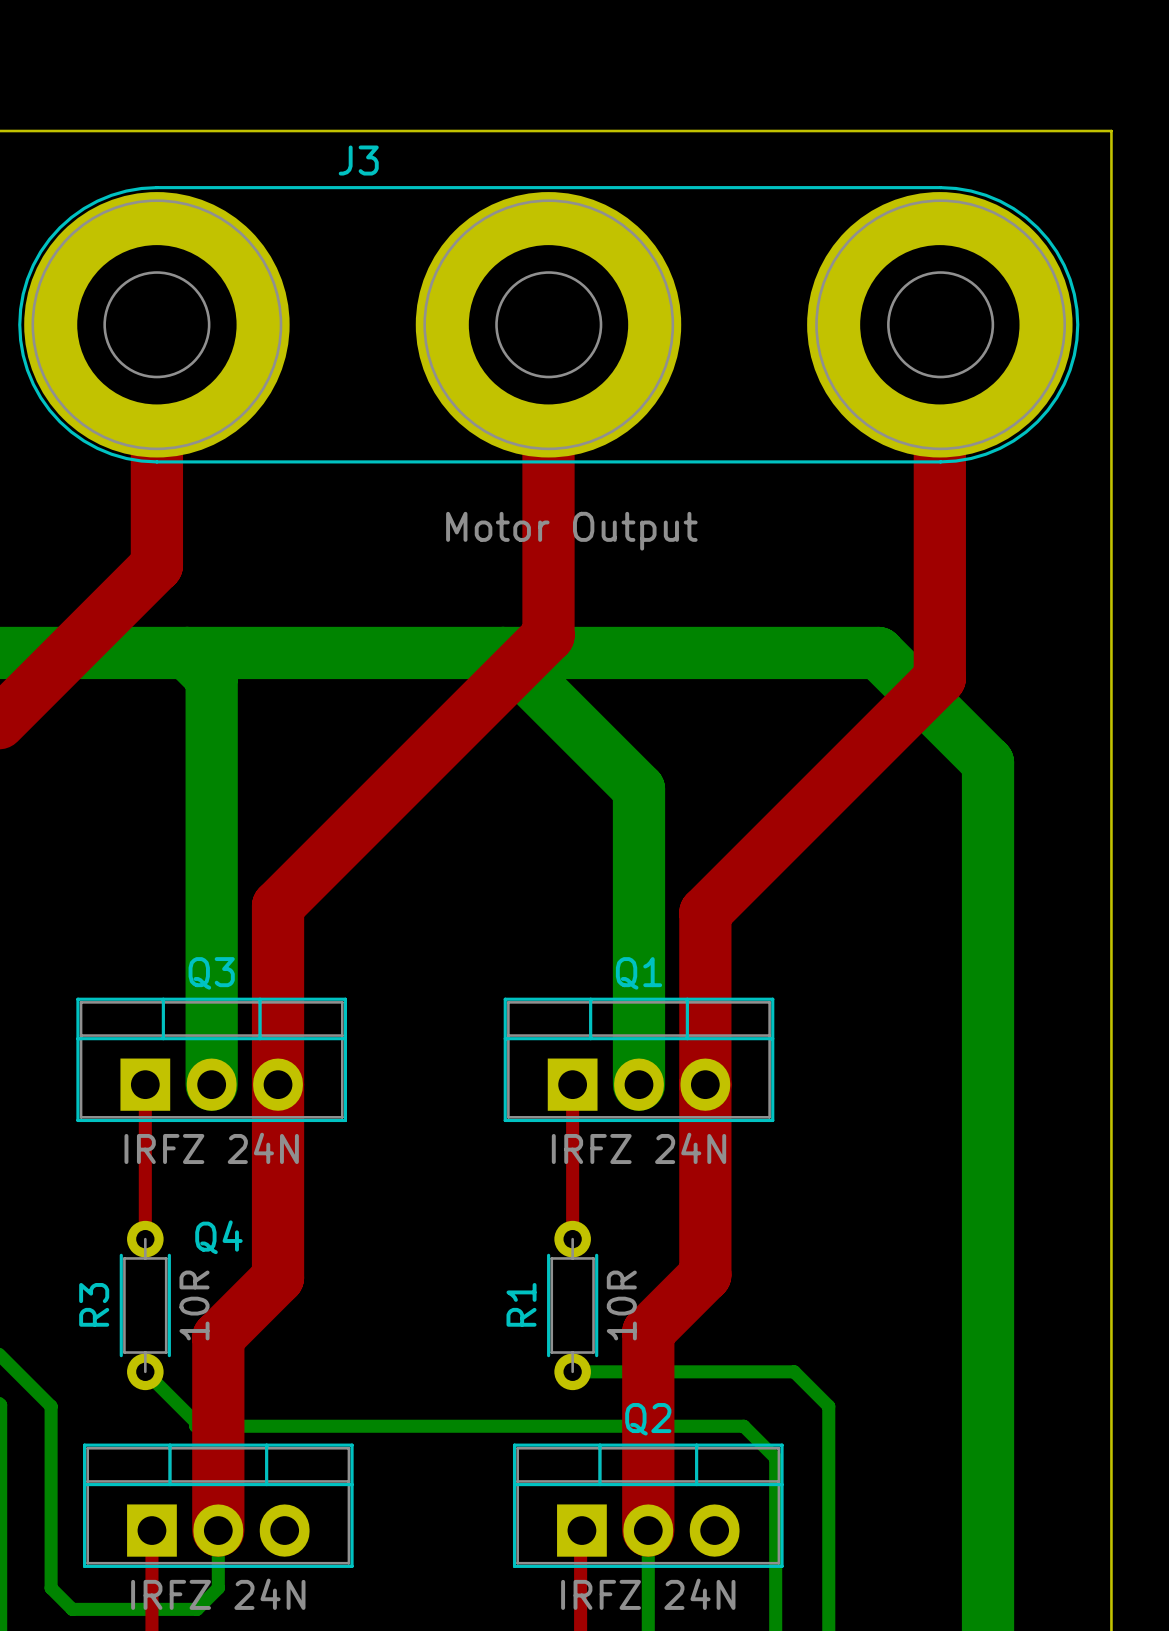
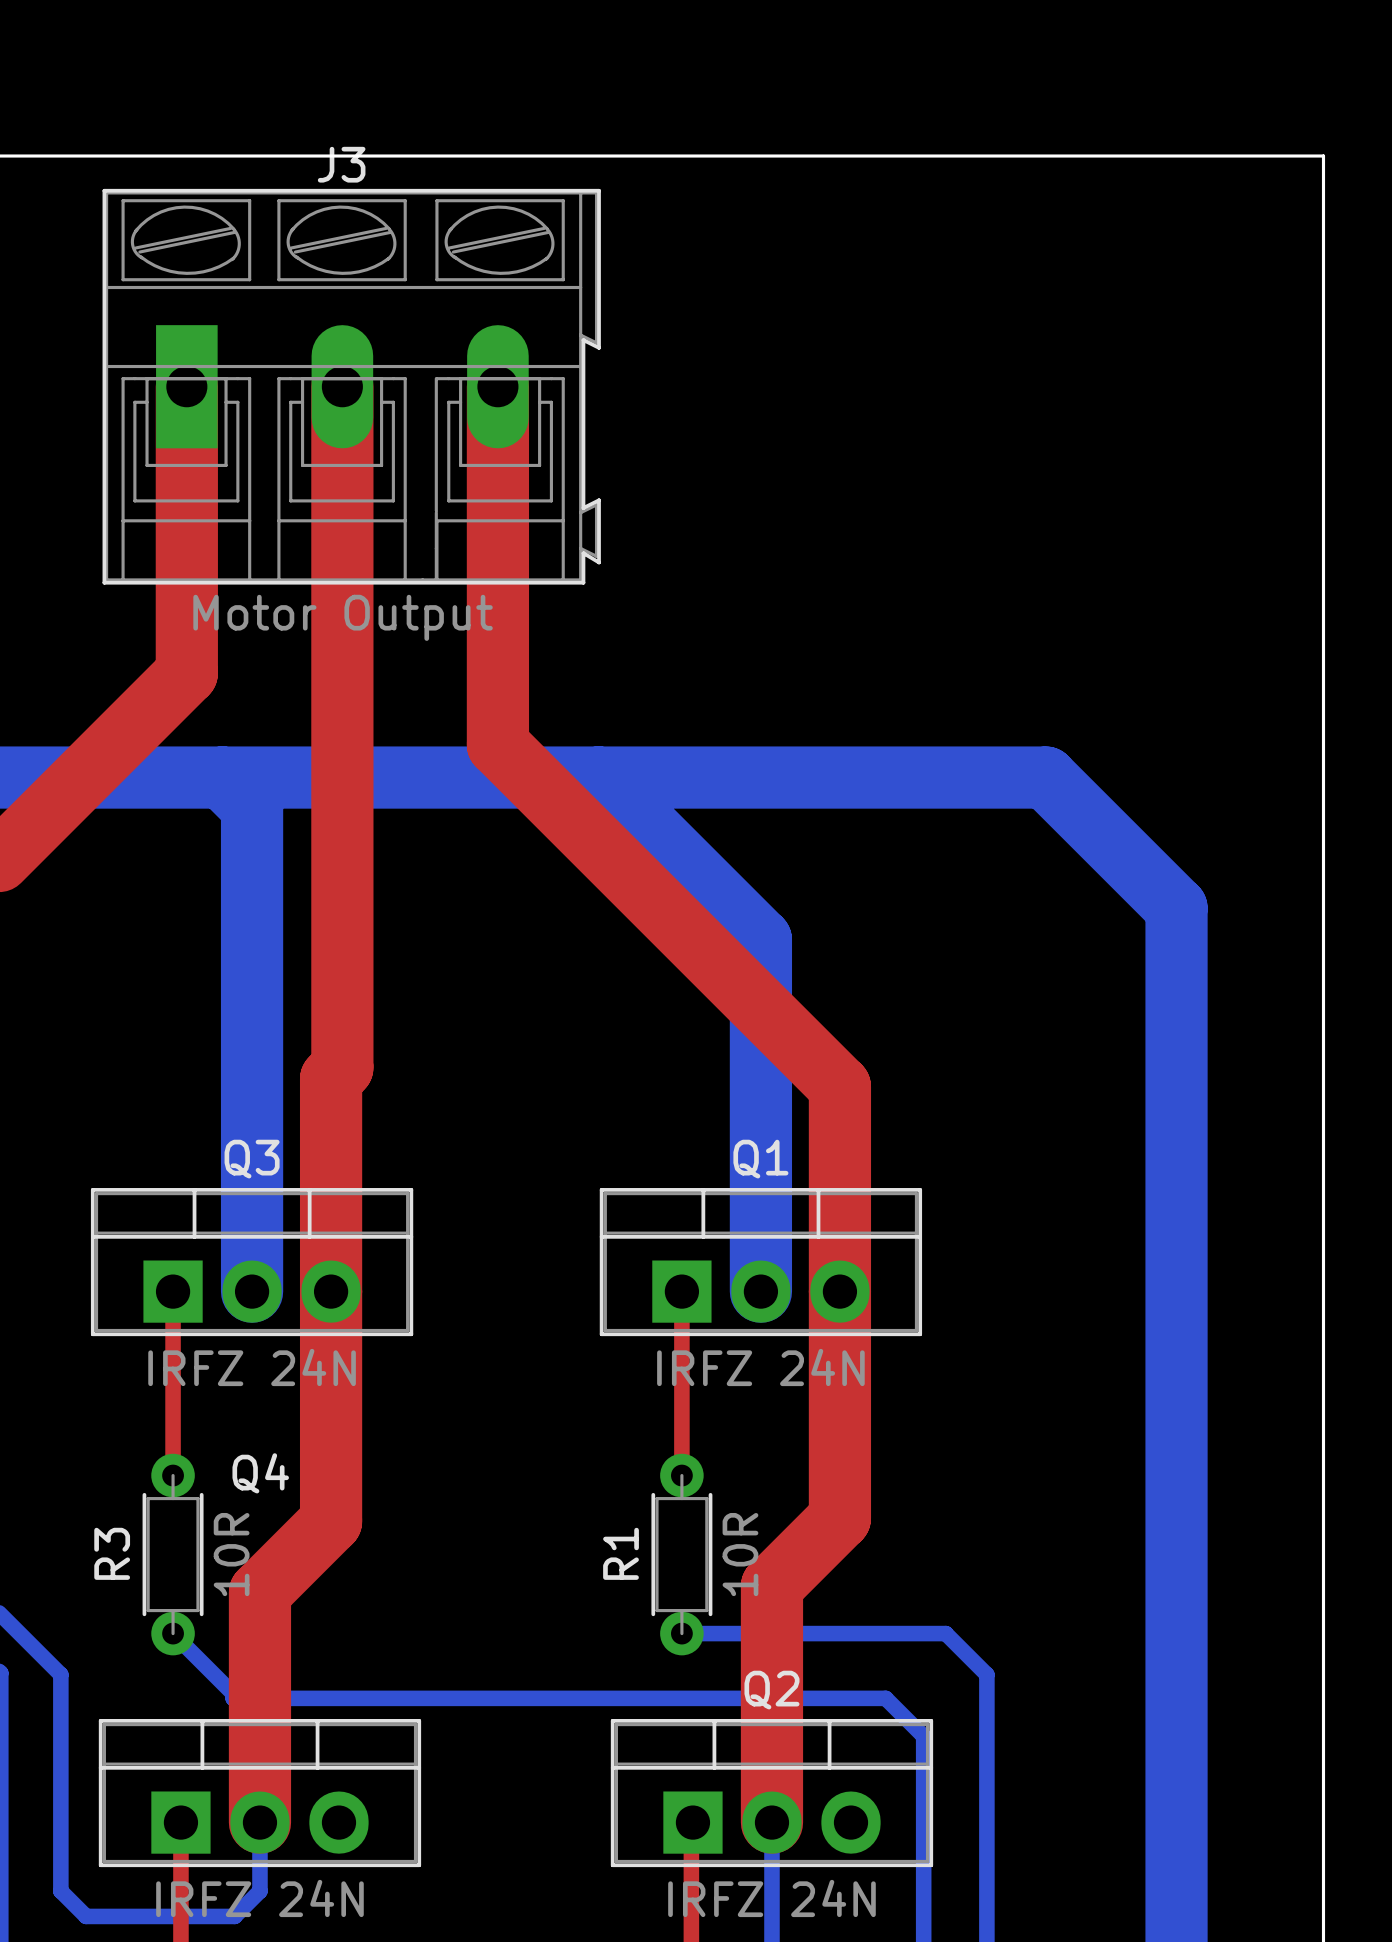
J3 name position: J3 (358, 160) -> J3 (341, 164)
J3 footprint: [18, 186, 1080, 464] -> [102, 188, 601, 585]
top track: (548, 324) (548, 635) (287, 896) -> (342, 386) (342, 1067)
top track: (939, 324) (939, 678) (705, 912) -> (497, 386) (497, 744) (839, 1086)

